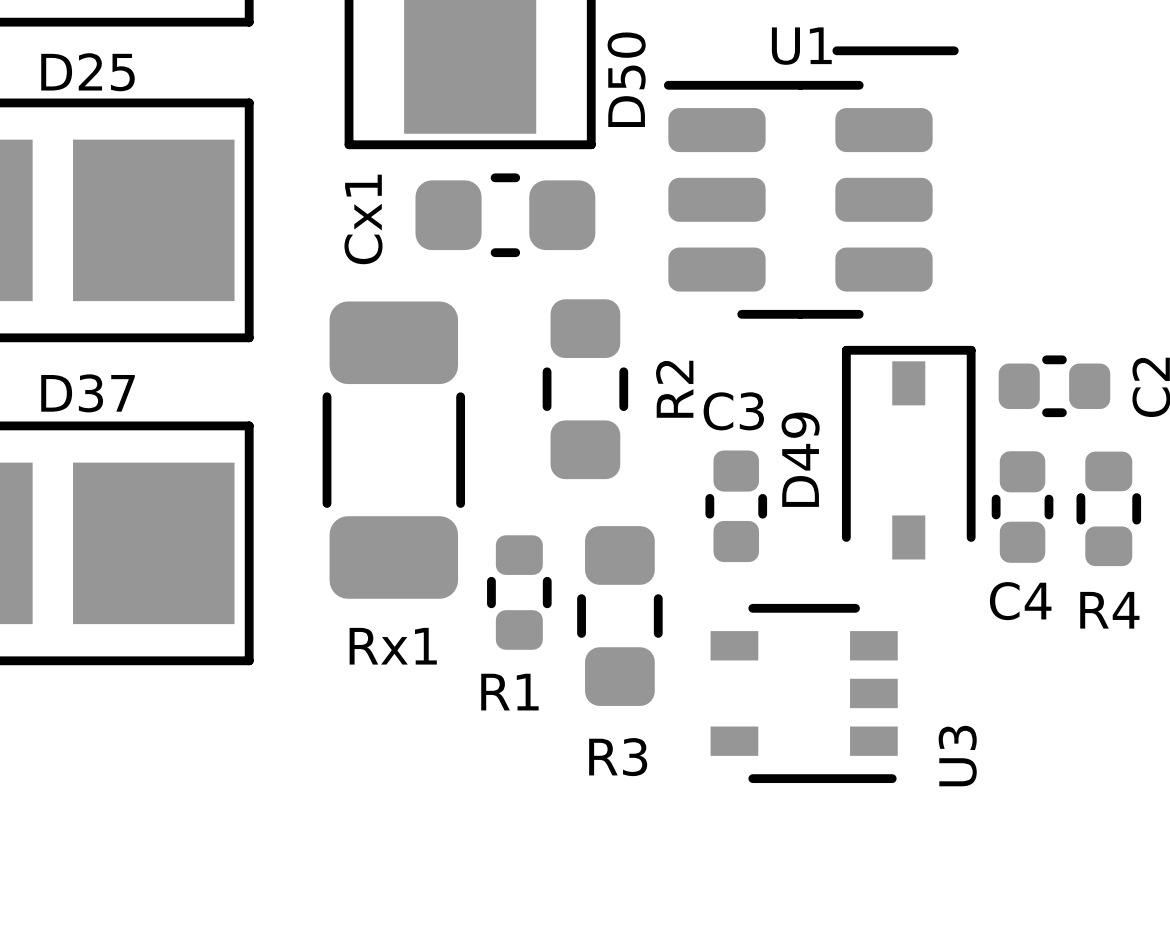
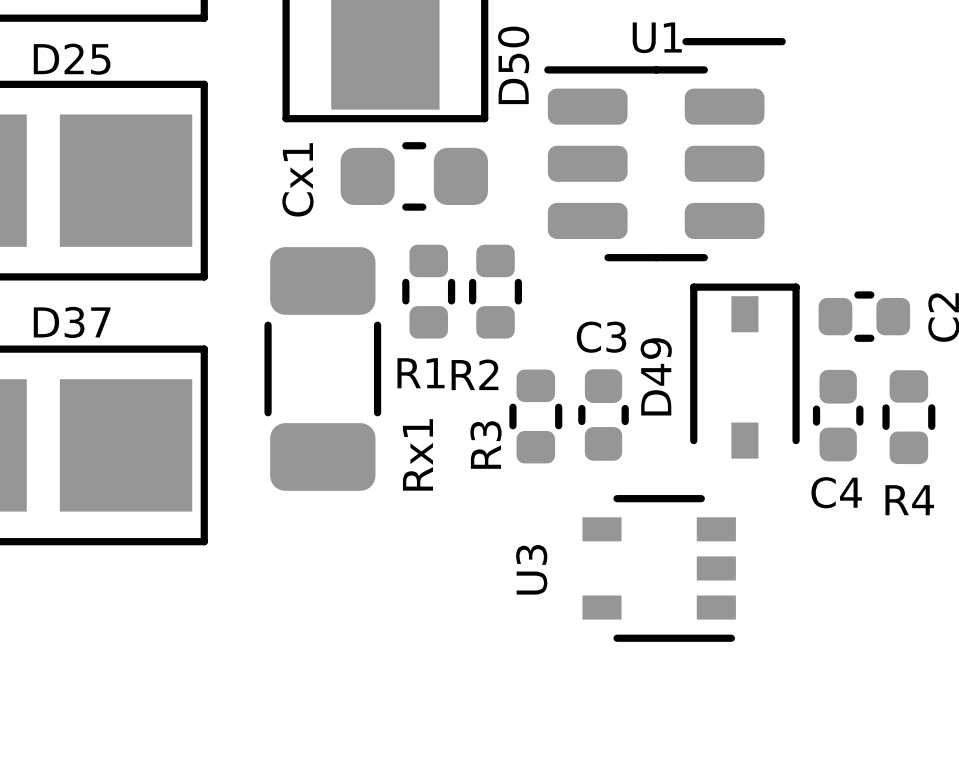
R2 footprint: [542, 299, 629, 480] -> [469, 244, 522, 339]
R2 name rotation: 0° (674, 389) -> 90° clockwise (475, 374)
R2 name position: R2 (674, 389) -> R2 (475, 374)
R3 footprint: [577, 526, 663, 706] -> [509, 369, 563, 464]
R1 position: (519, 592) -> (428, 291)
Rx1 name rotation: 0° (393, 646) -> 90° counterclockwise (417, 454)
Rx1 name position: Rx1 (393, 646) -> Rx1 (417, 454)
U3 name position: U3 (957, 756) -> U3 (531, 569)

